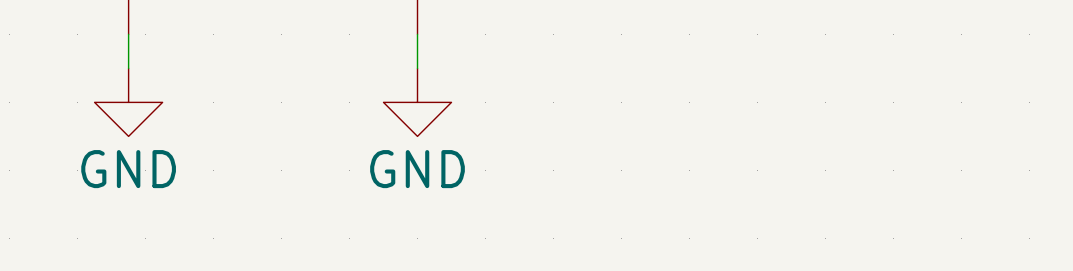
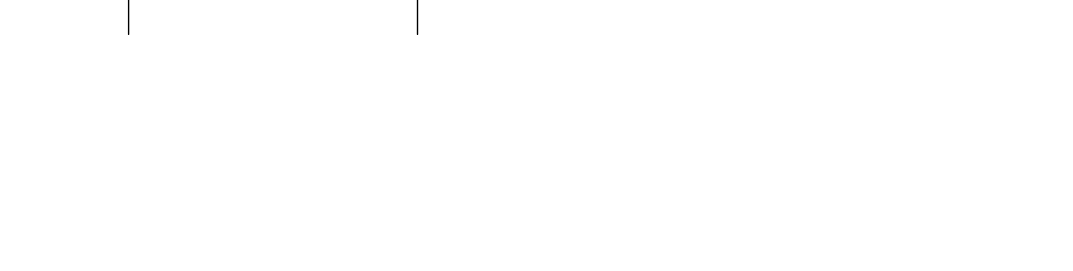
wire: (128, 34) (128, 68) -> none
wire: (417, 34) (417, 68) -> none
power symbol: GND (128, 102) -> none
power symbol: GND (417, 102) -> none

